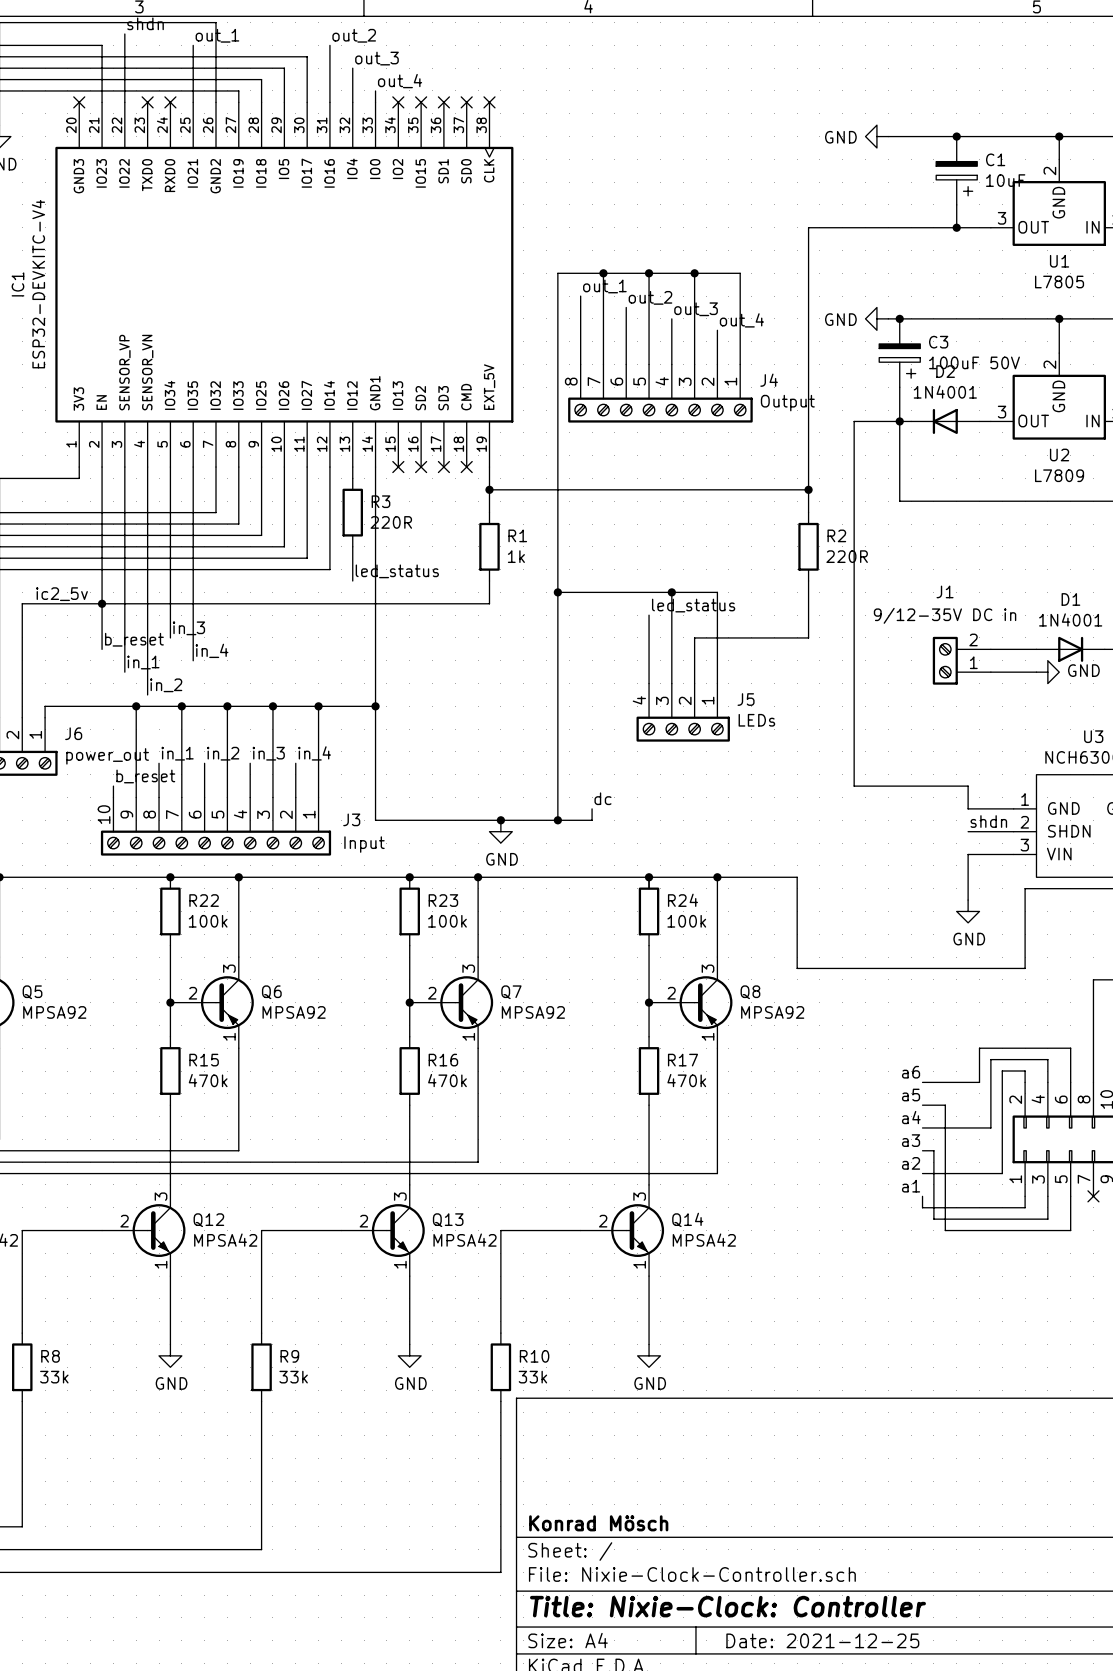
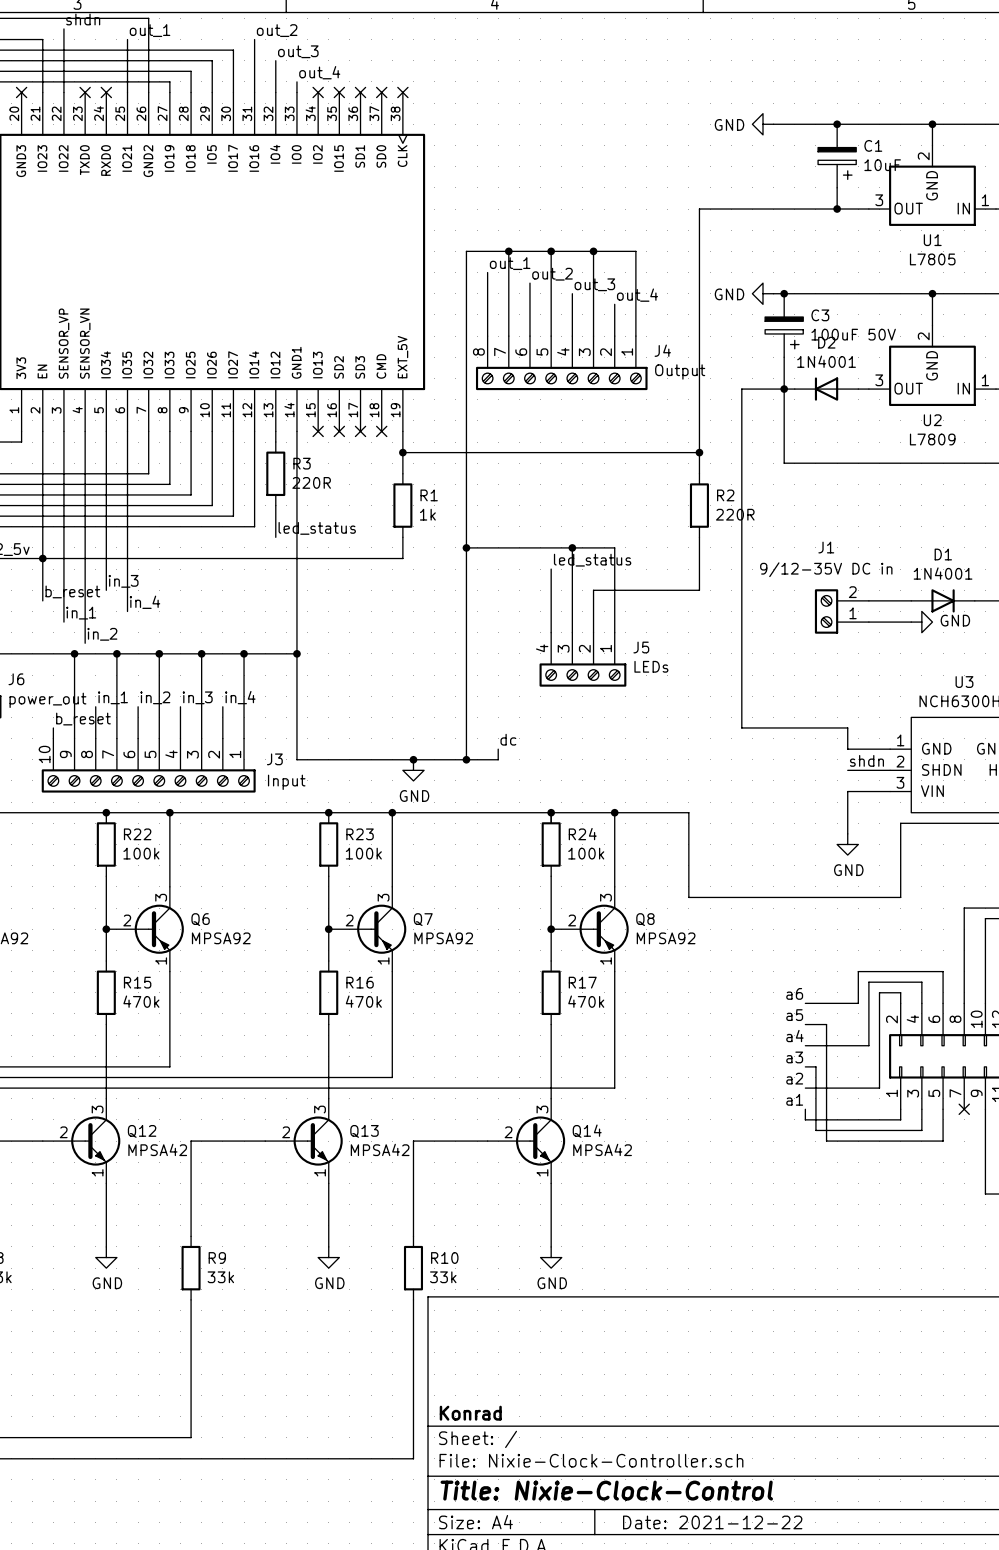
title block: Konrad Mösch (598, 1523) -> Konrad (470, 1413)
title block: Title: Nixie-Clock: Controller (727, 1606) -> Title: Nixie-Clock-Control (606, 1490)
title block: Date: 2021-12-25 (822, 1640) -> Date: 2021-12-22 (712, 1522)

